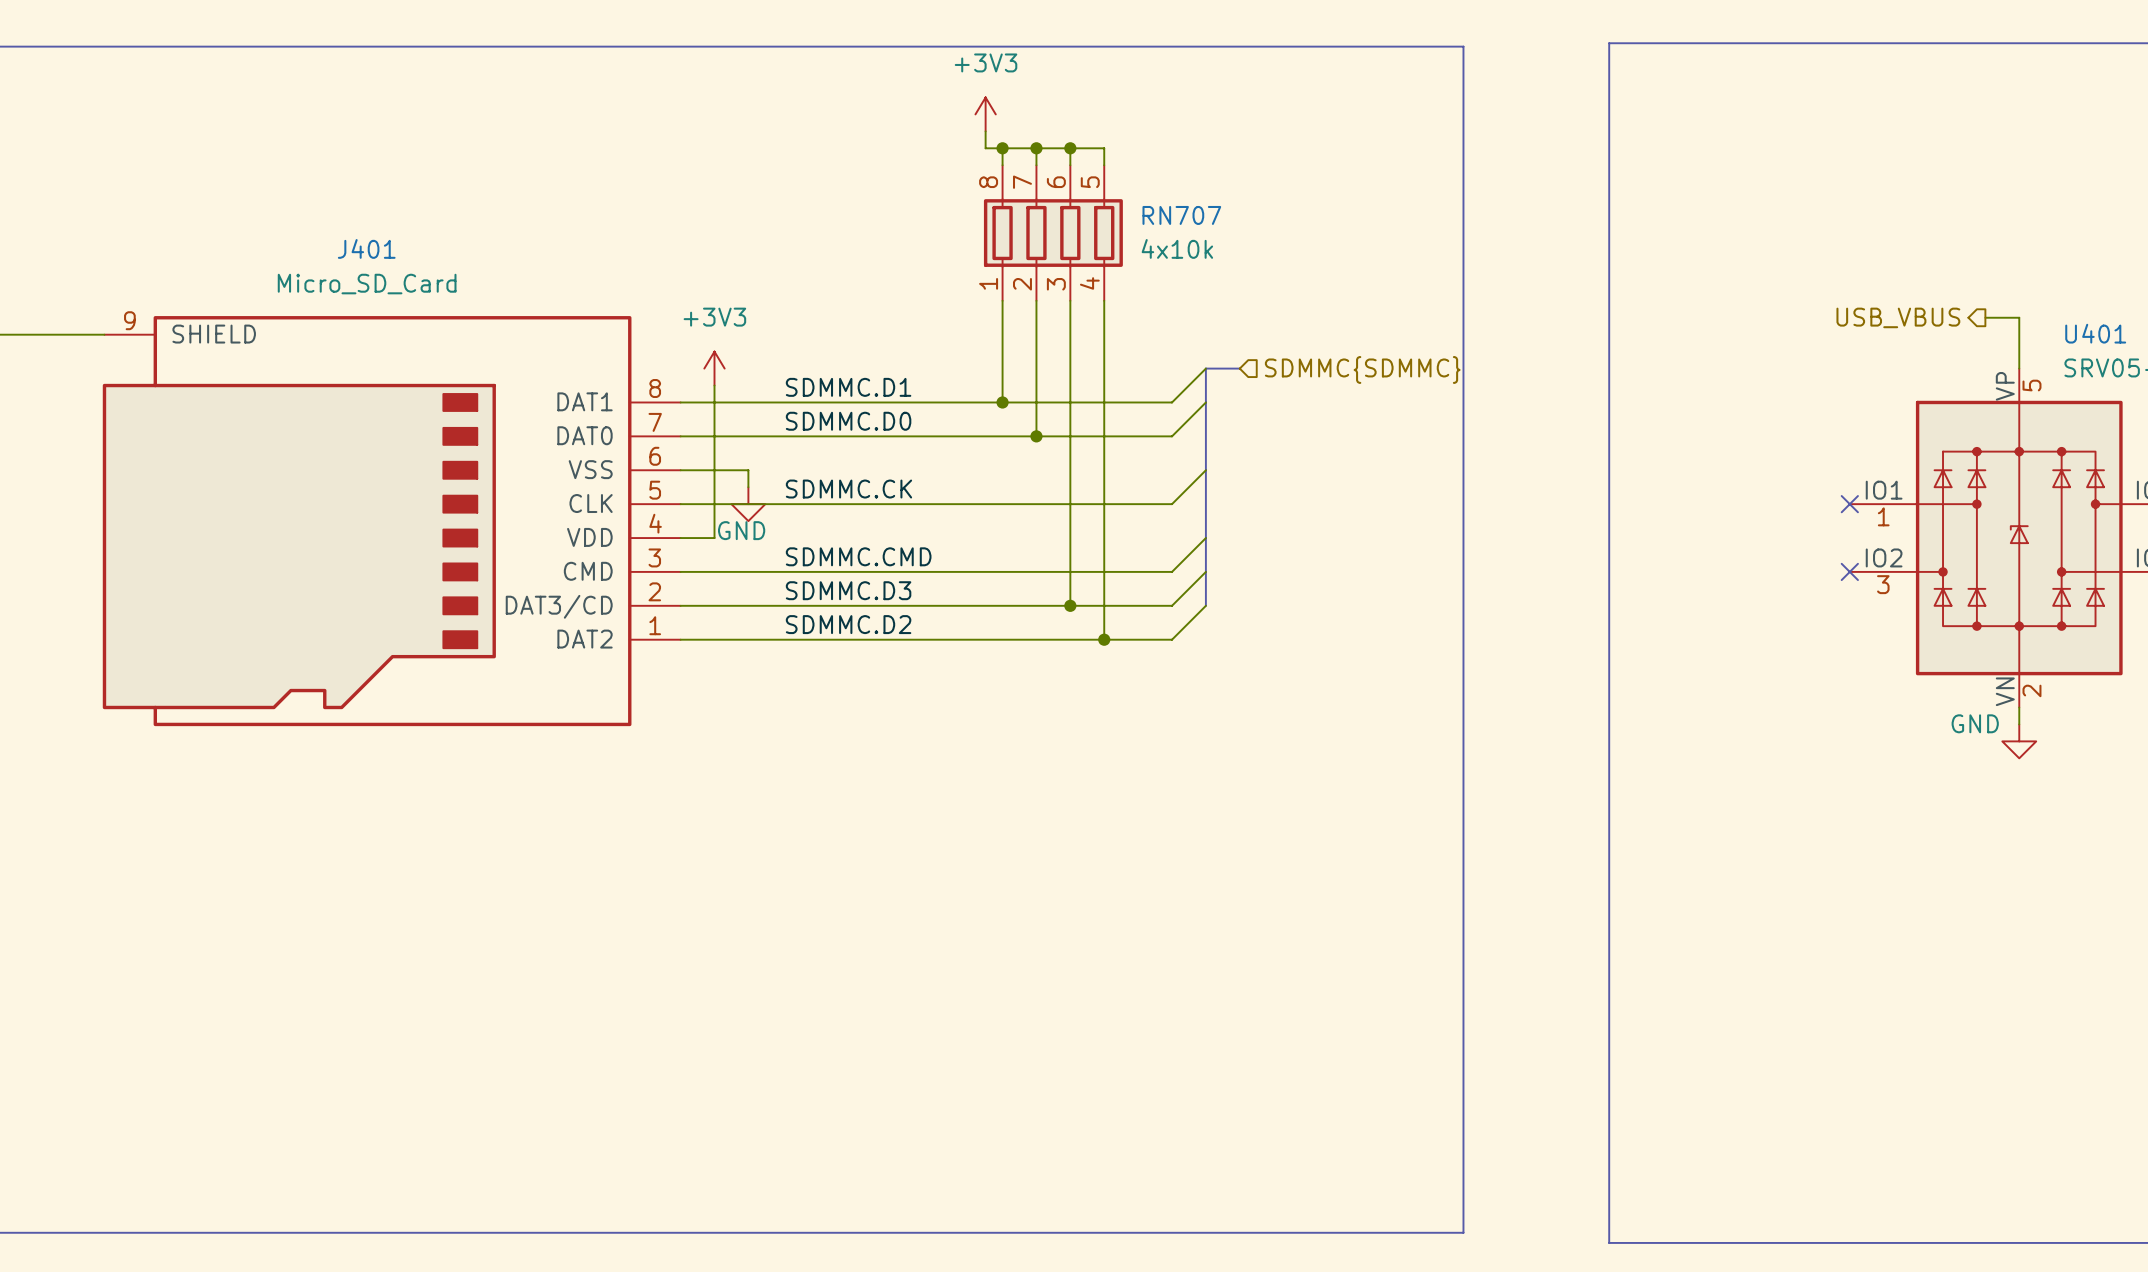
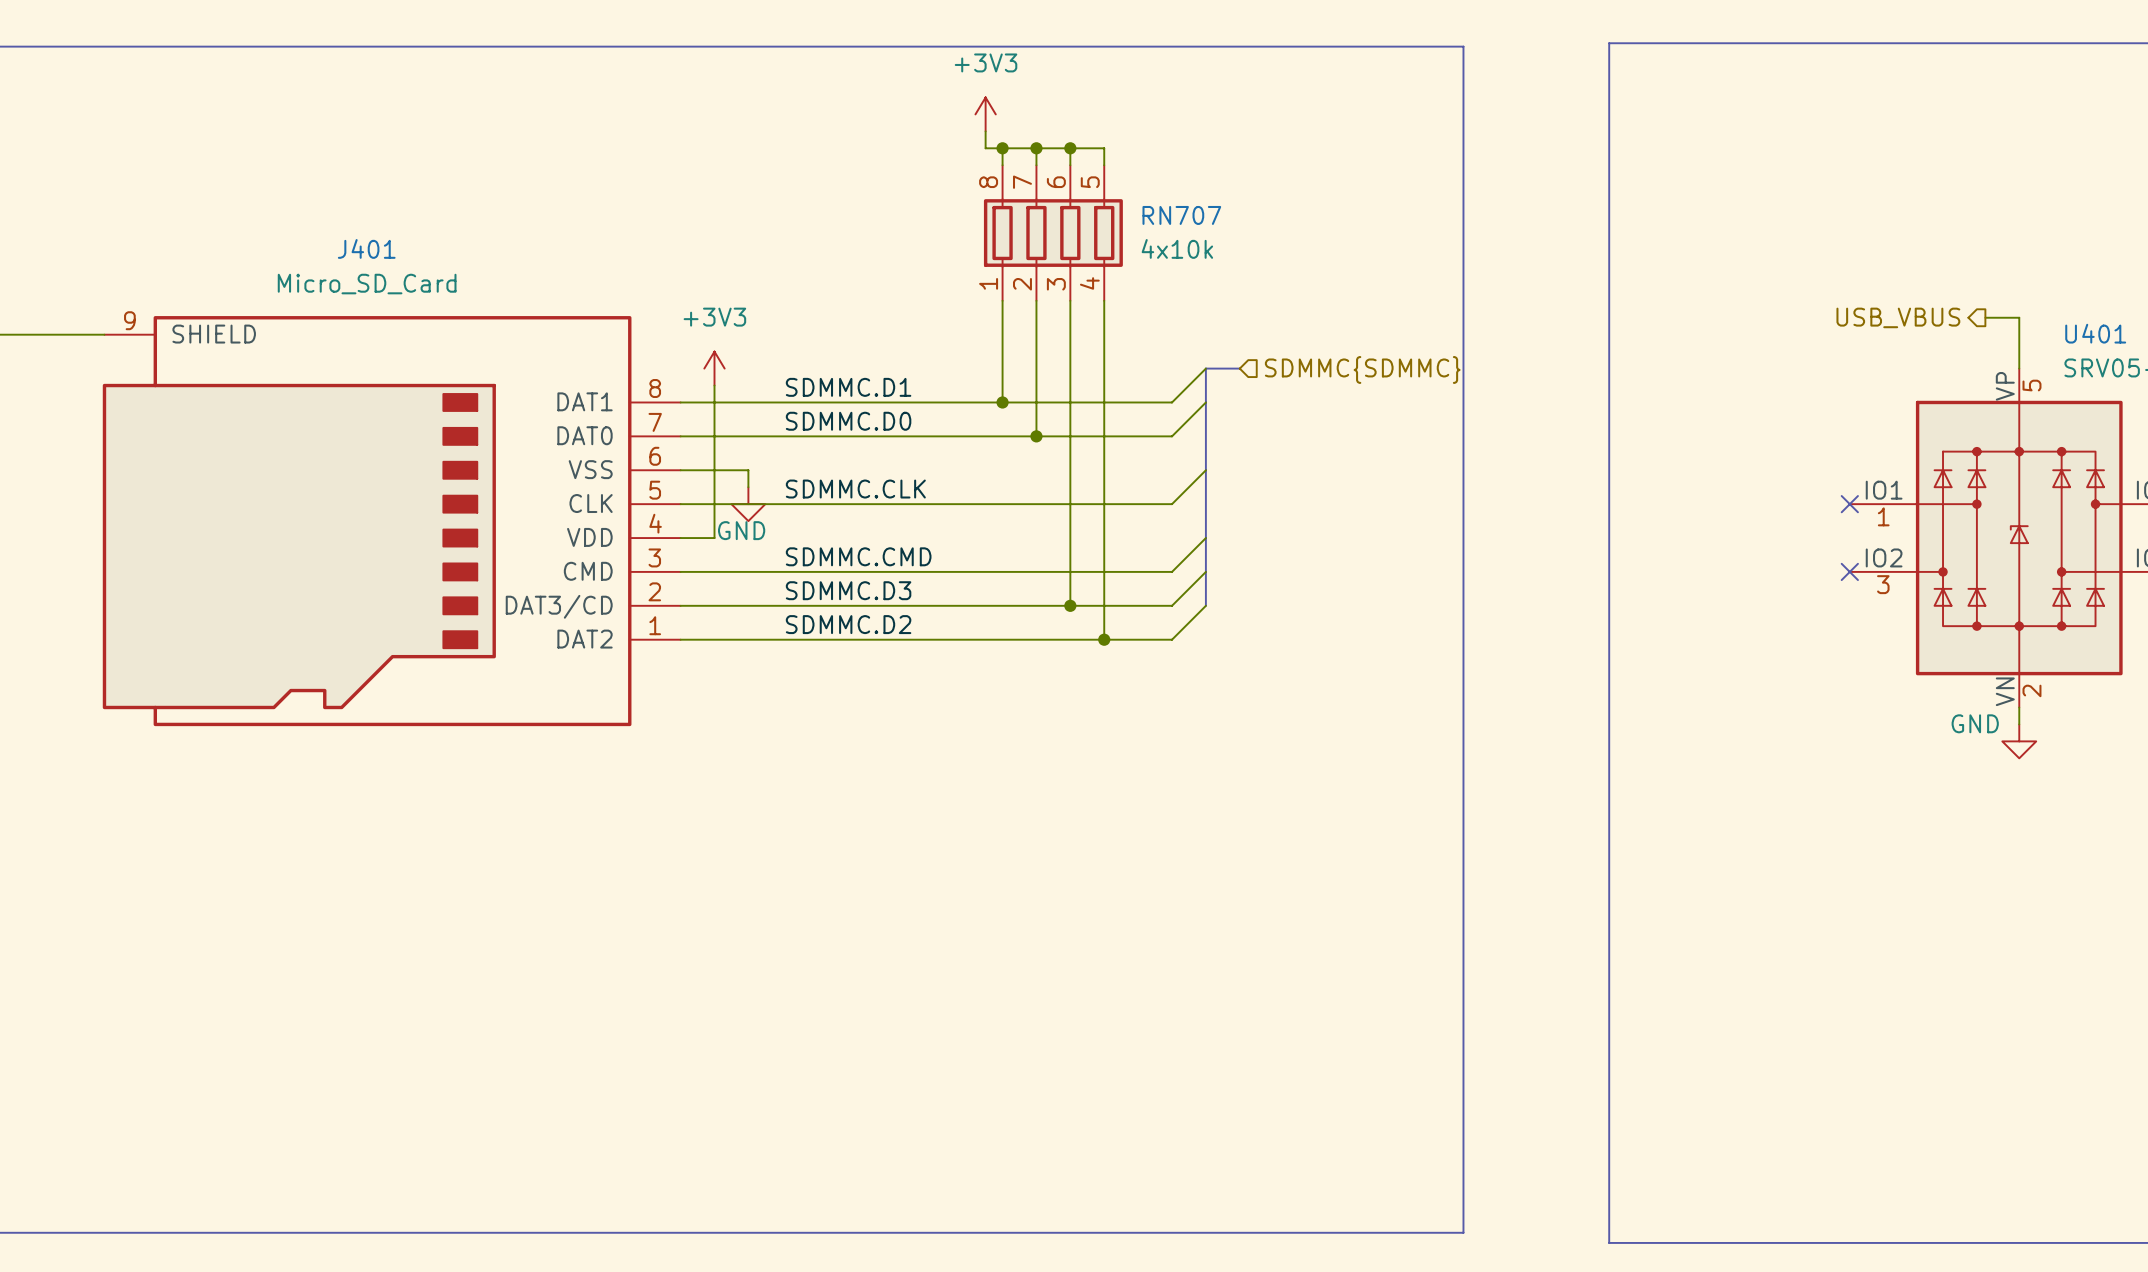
label: SDMMC.CK (848, 489) -> SDMMC.CLK (855, 489)

